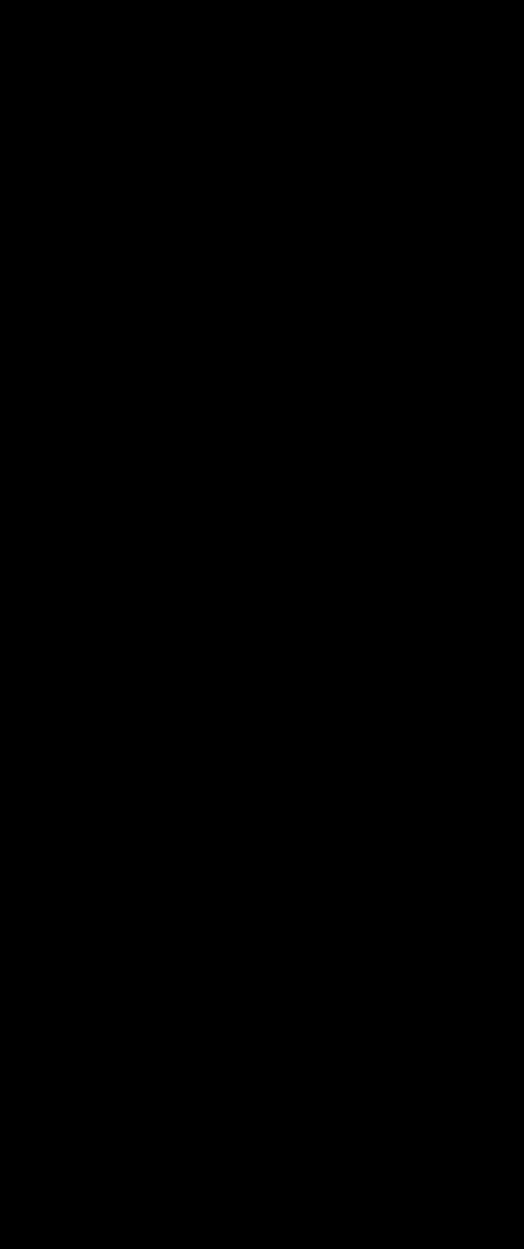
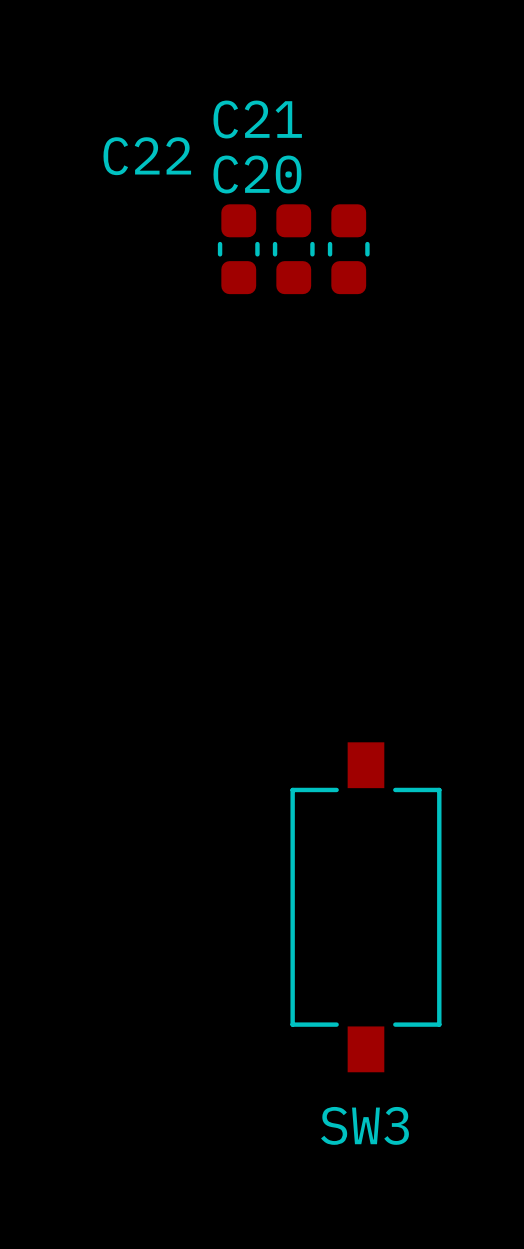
C22: none -> (238, 249)
C21: none -> (293, 249)
C20: none -> (348, 249)
SW3: none -> (365, 907)

